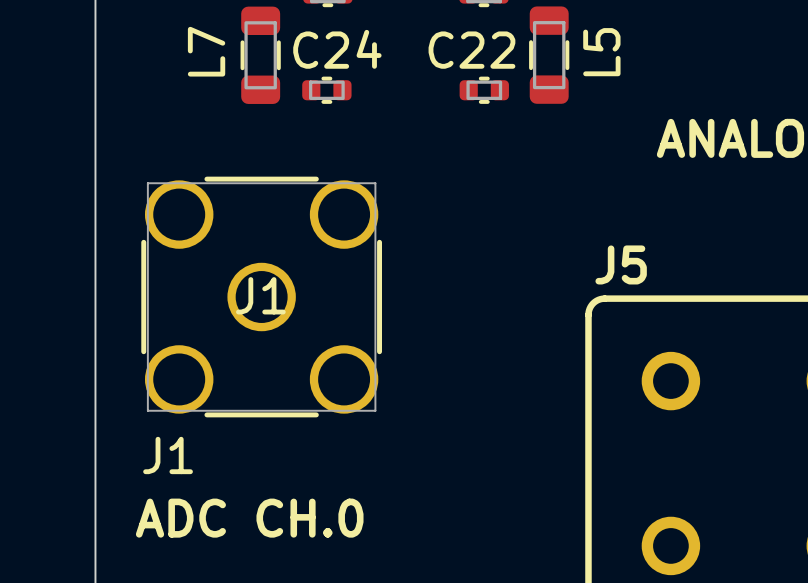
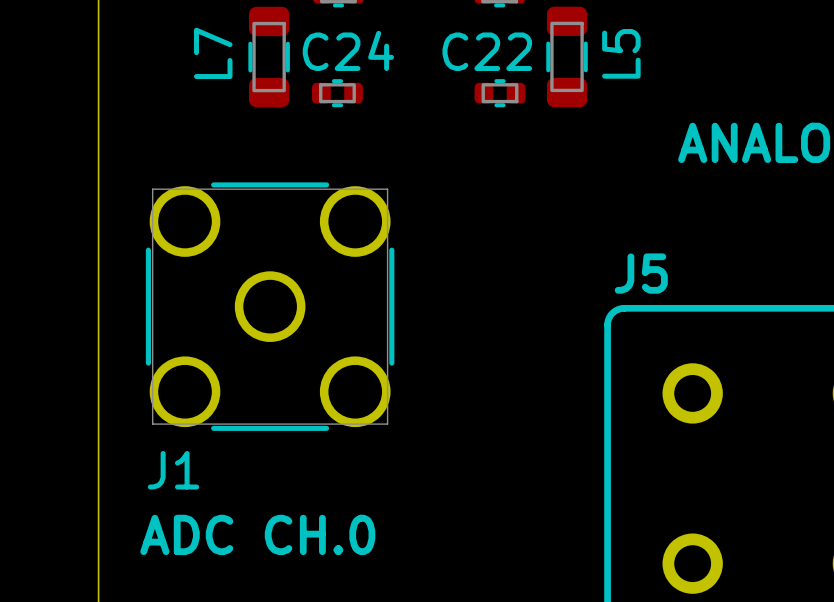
J1 name: J1 (260, 295) -> none

